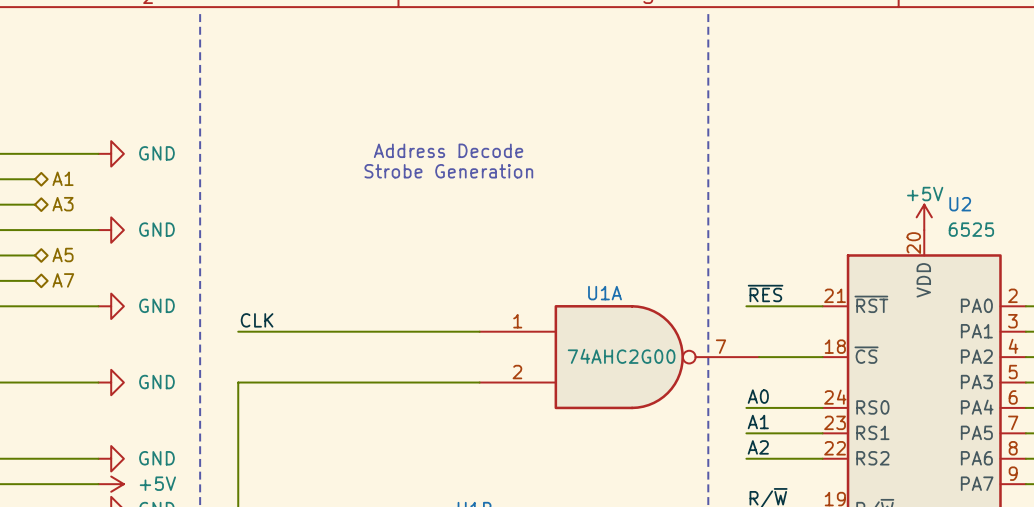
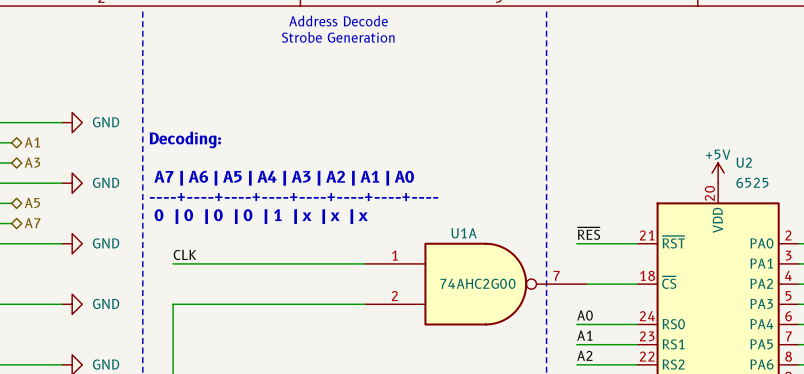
text position: Address Decode (448, 150) -> Address Decode (338, 21)
text position: Strobe Generation (448, 171) -> Strobe Generation (338, 37)
text: none -> Decoding: (185, 139)
text: none -> A7 | A6 | A5 | A4 | A3 | A2 | A1 | A0 (284, 178)
text: none -> ----+----+----+----+----+----+----+---- (294, 197)
text: none -> 0 | 0 | 0 | 0 | 1 | x | x | x (261, 216)

